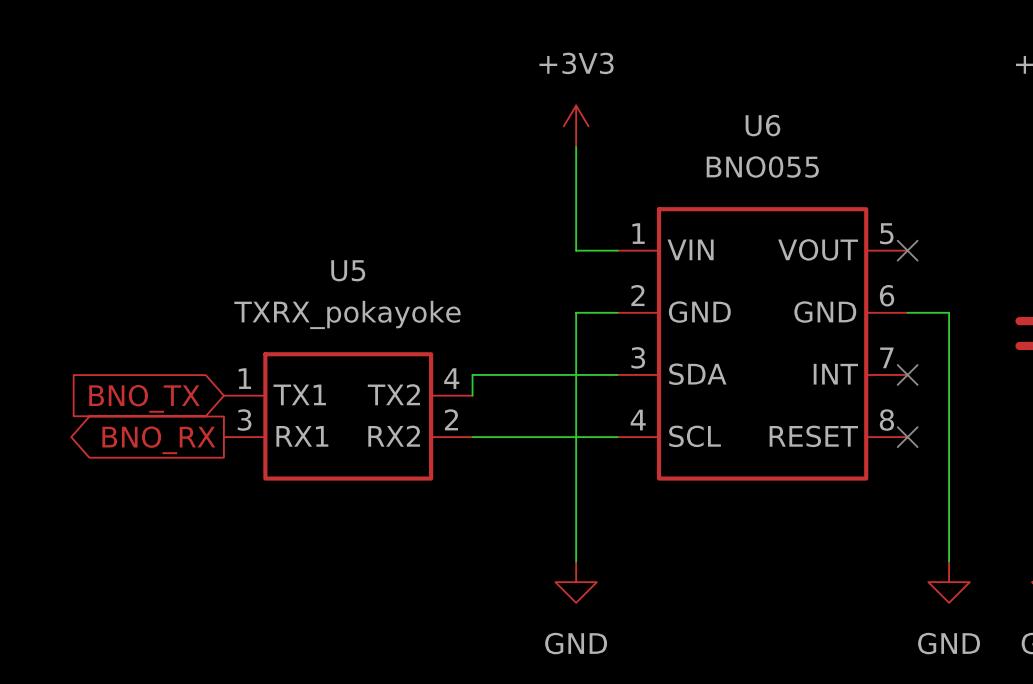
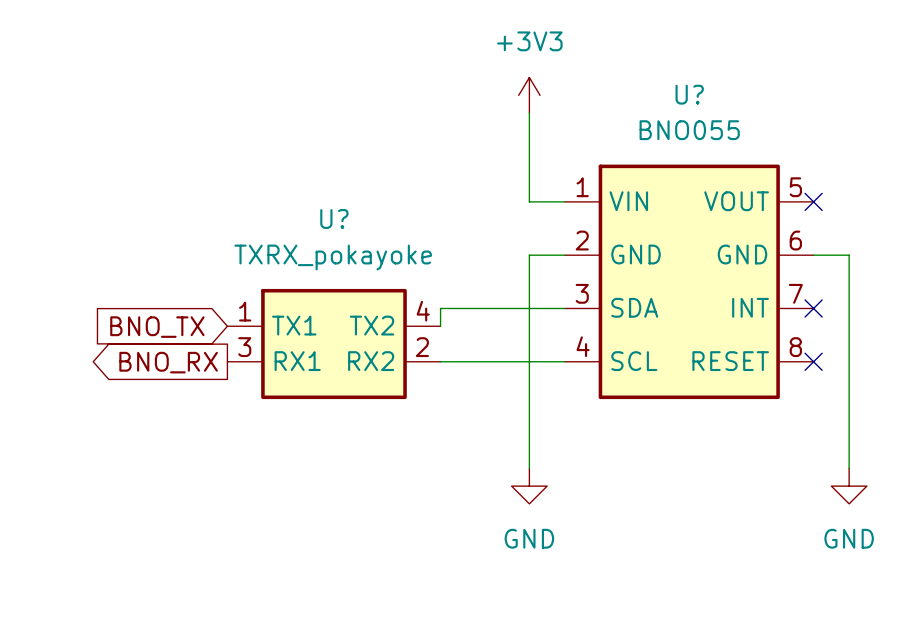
U6 name: U6 (762, 125) -> U? (689, 94)
U5 name: U5 (348, 270) -> U? (334, 218)

